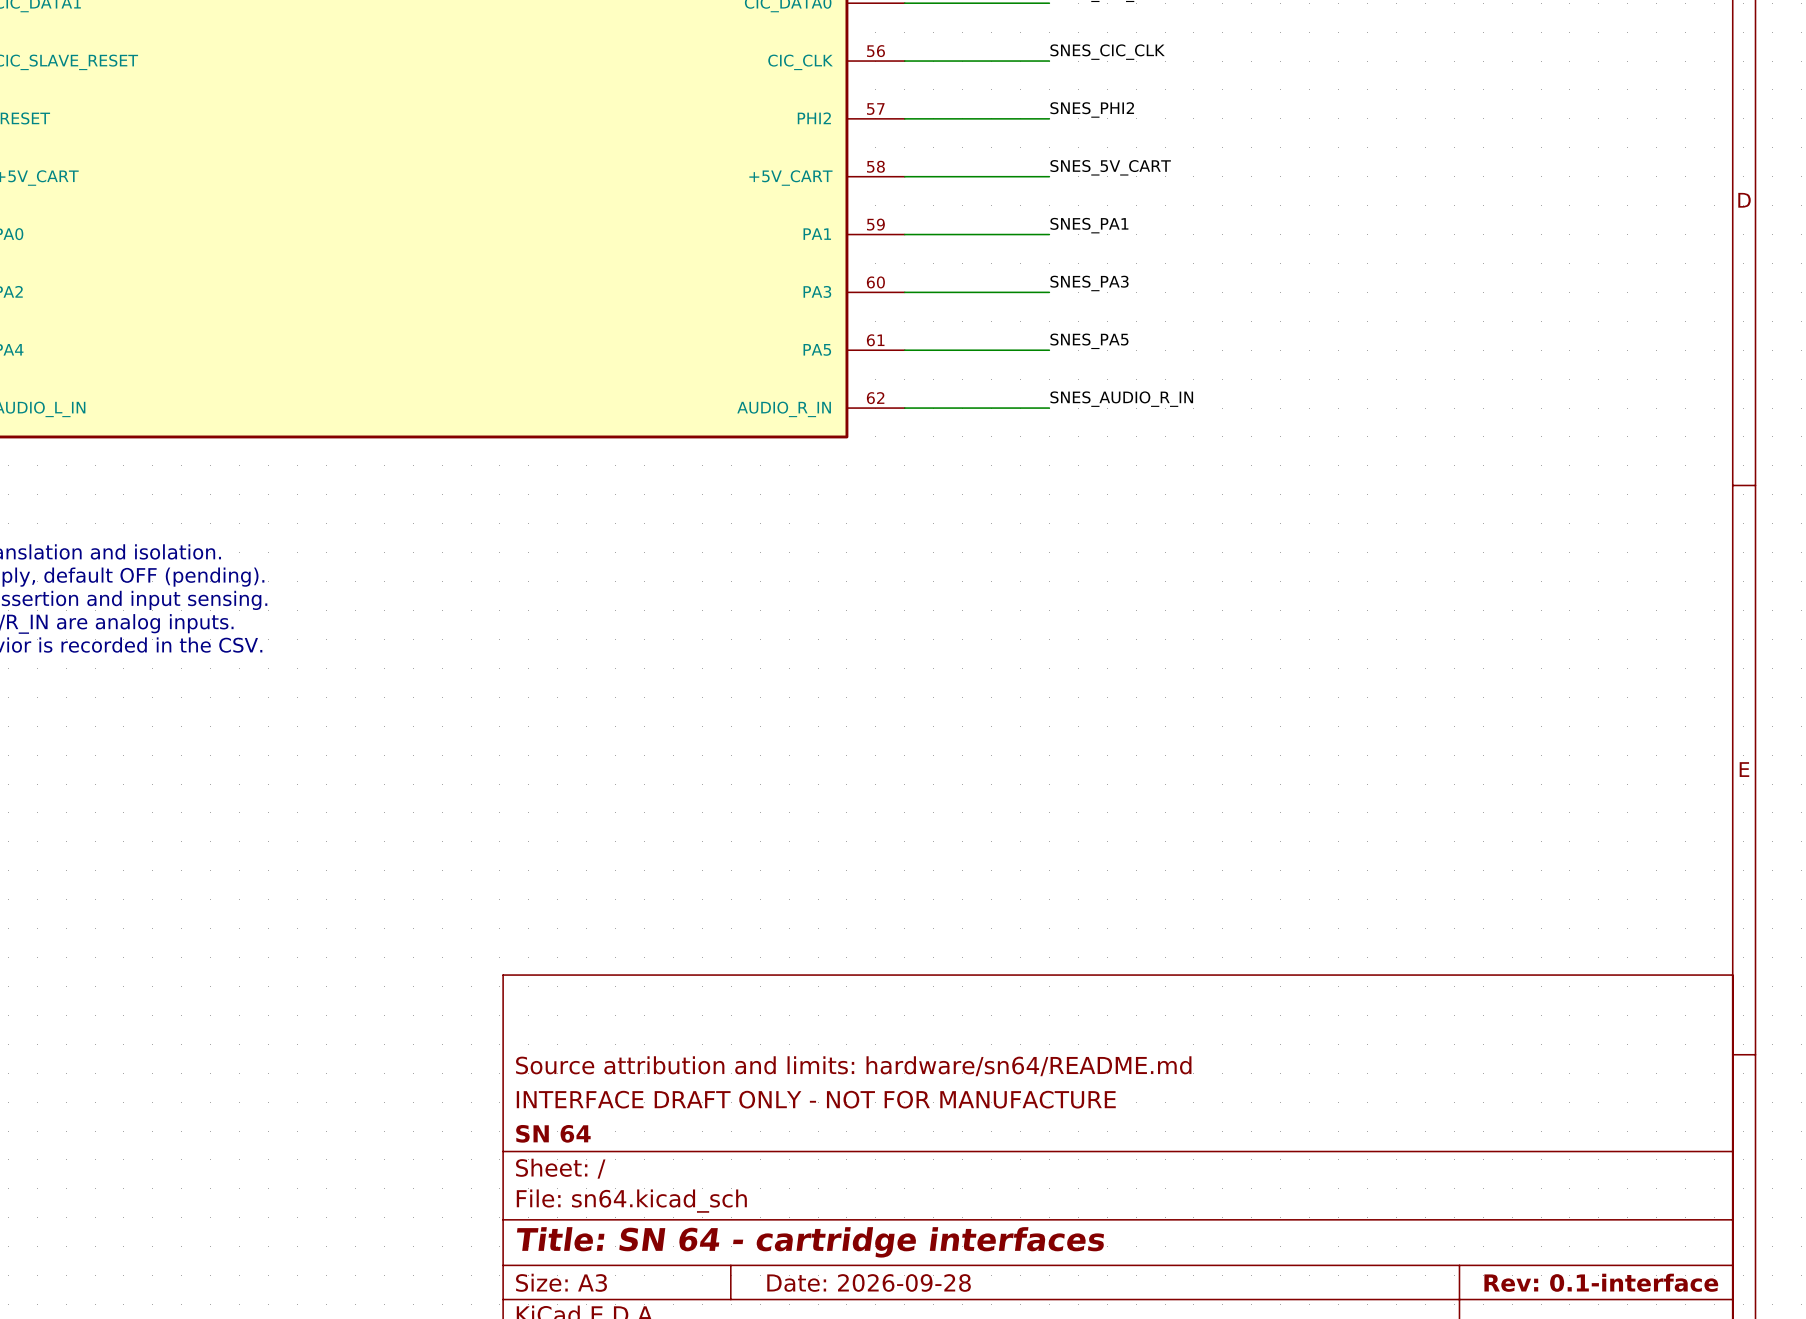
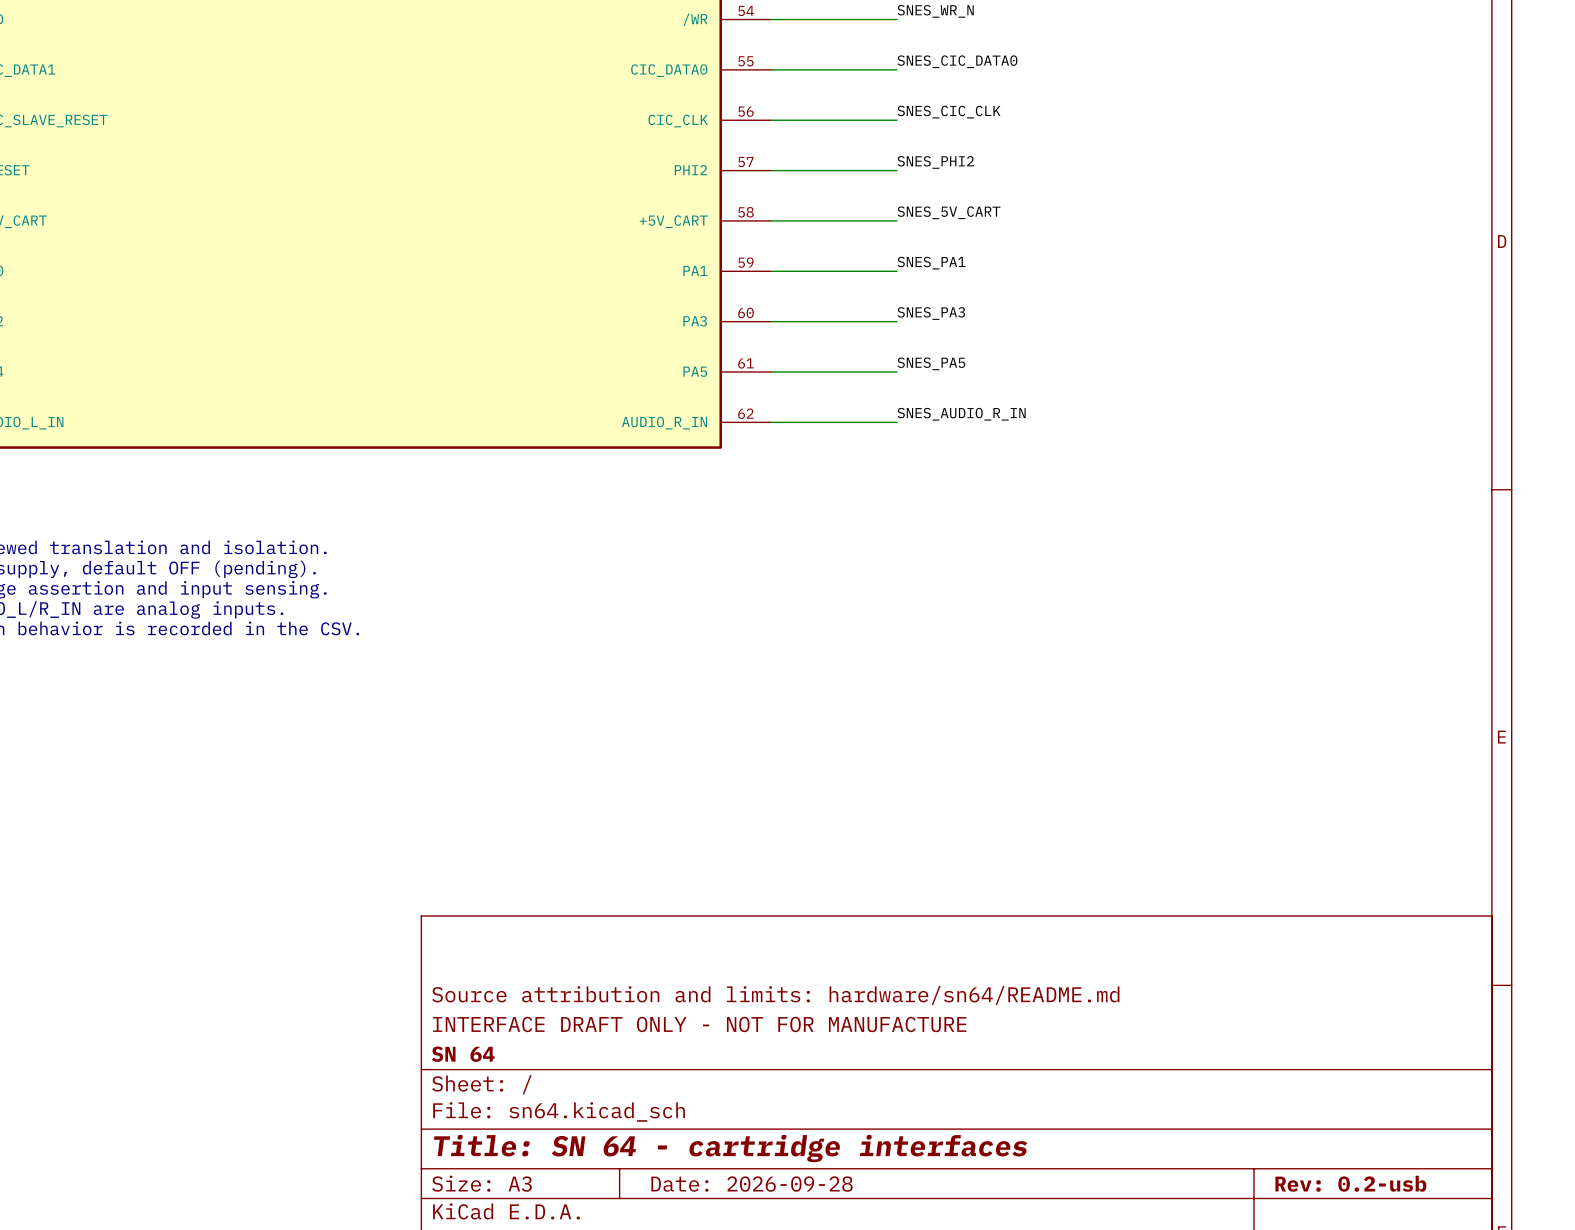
title block: Rev: 0.1-interface (1601, 1282) -> Rev: 0.2-usb (1350, 1183)

